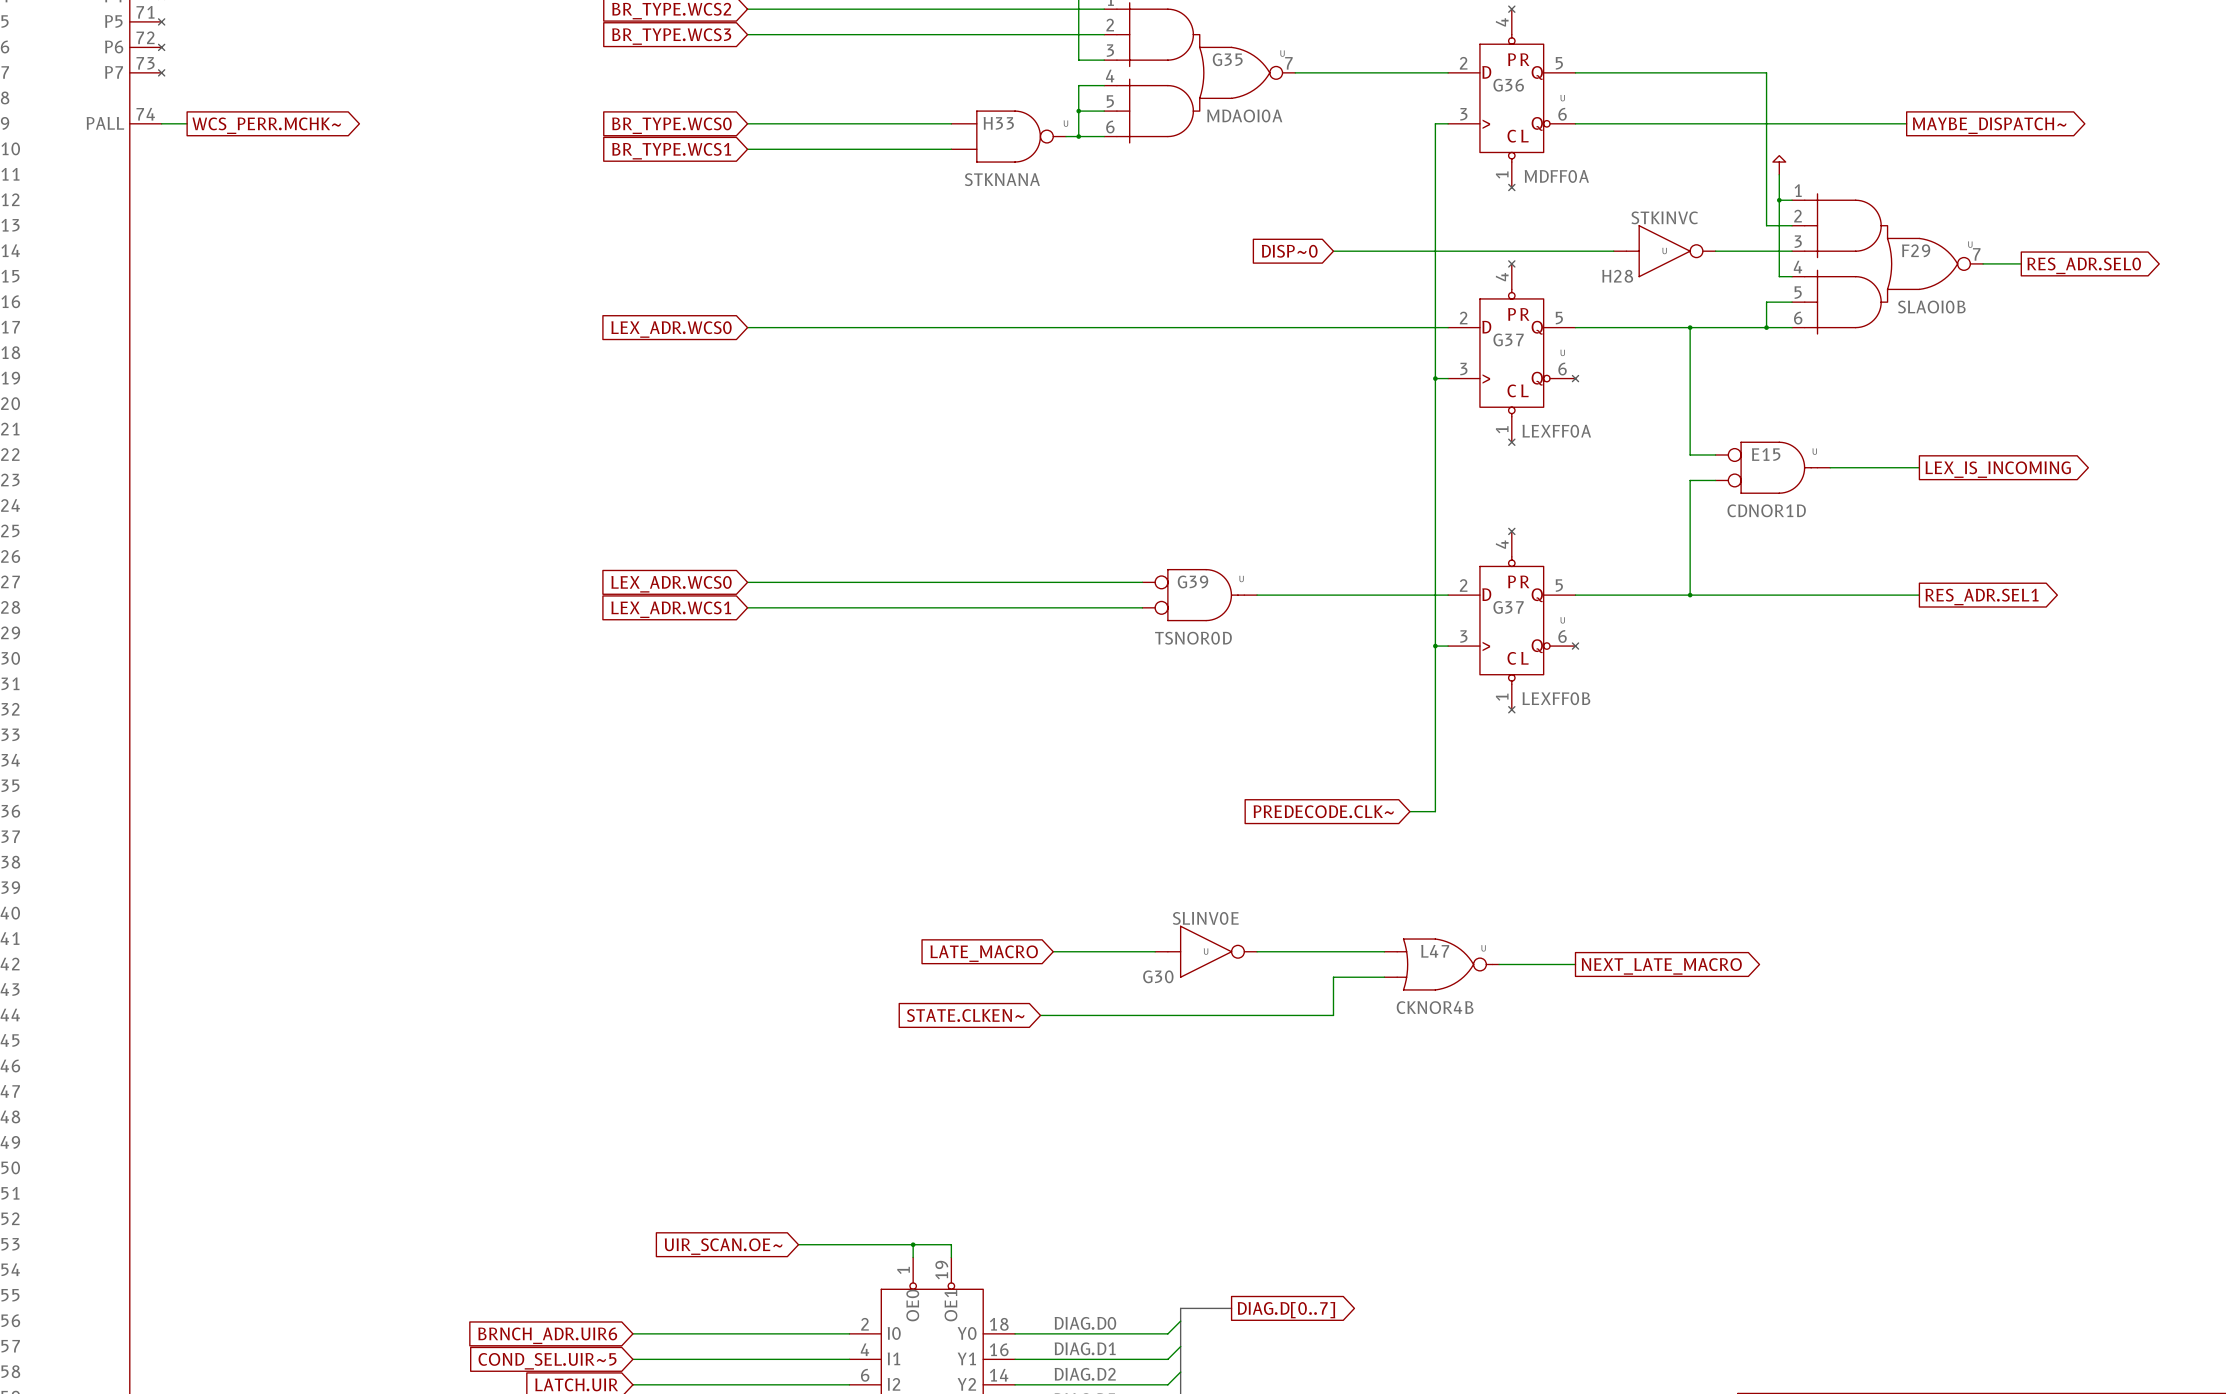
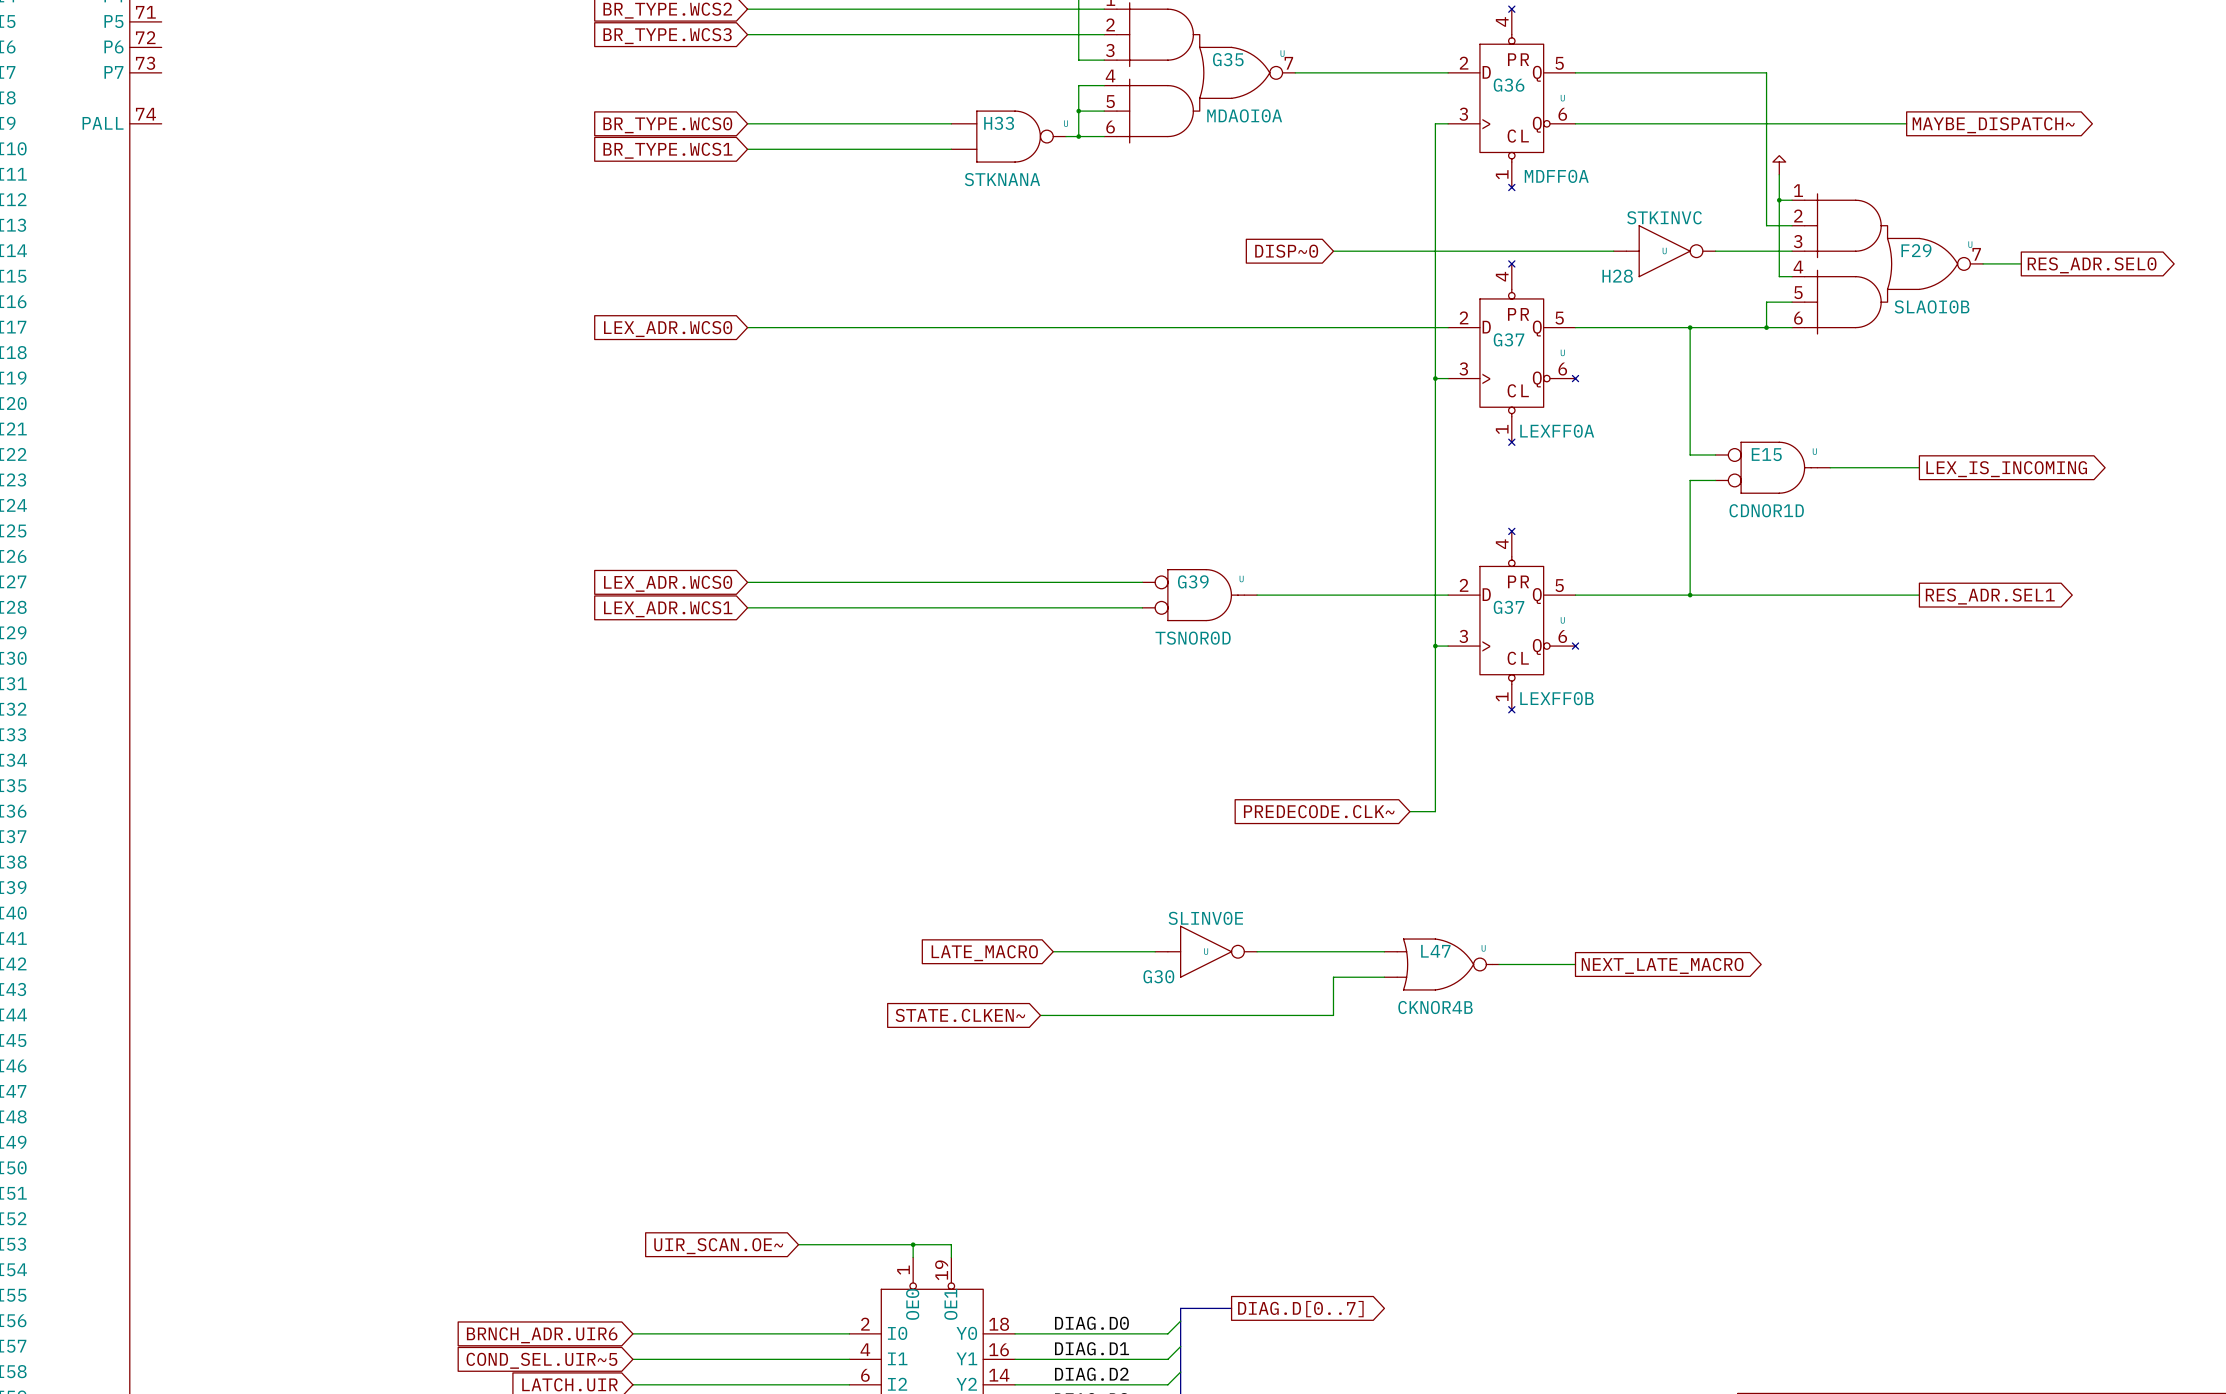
no-connect mark: (161, 21) -> none
no-connect mark: (161, 47) -> none
no-connect mark: (161, 72) -> none
wire: (161, 123) (187, 123) -> none
global label: WCS_PERR.MCHK~ (266, 125) -> none

